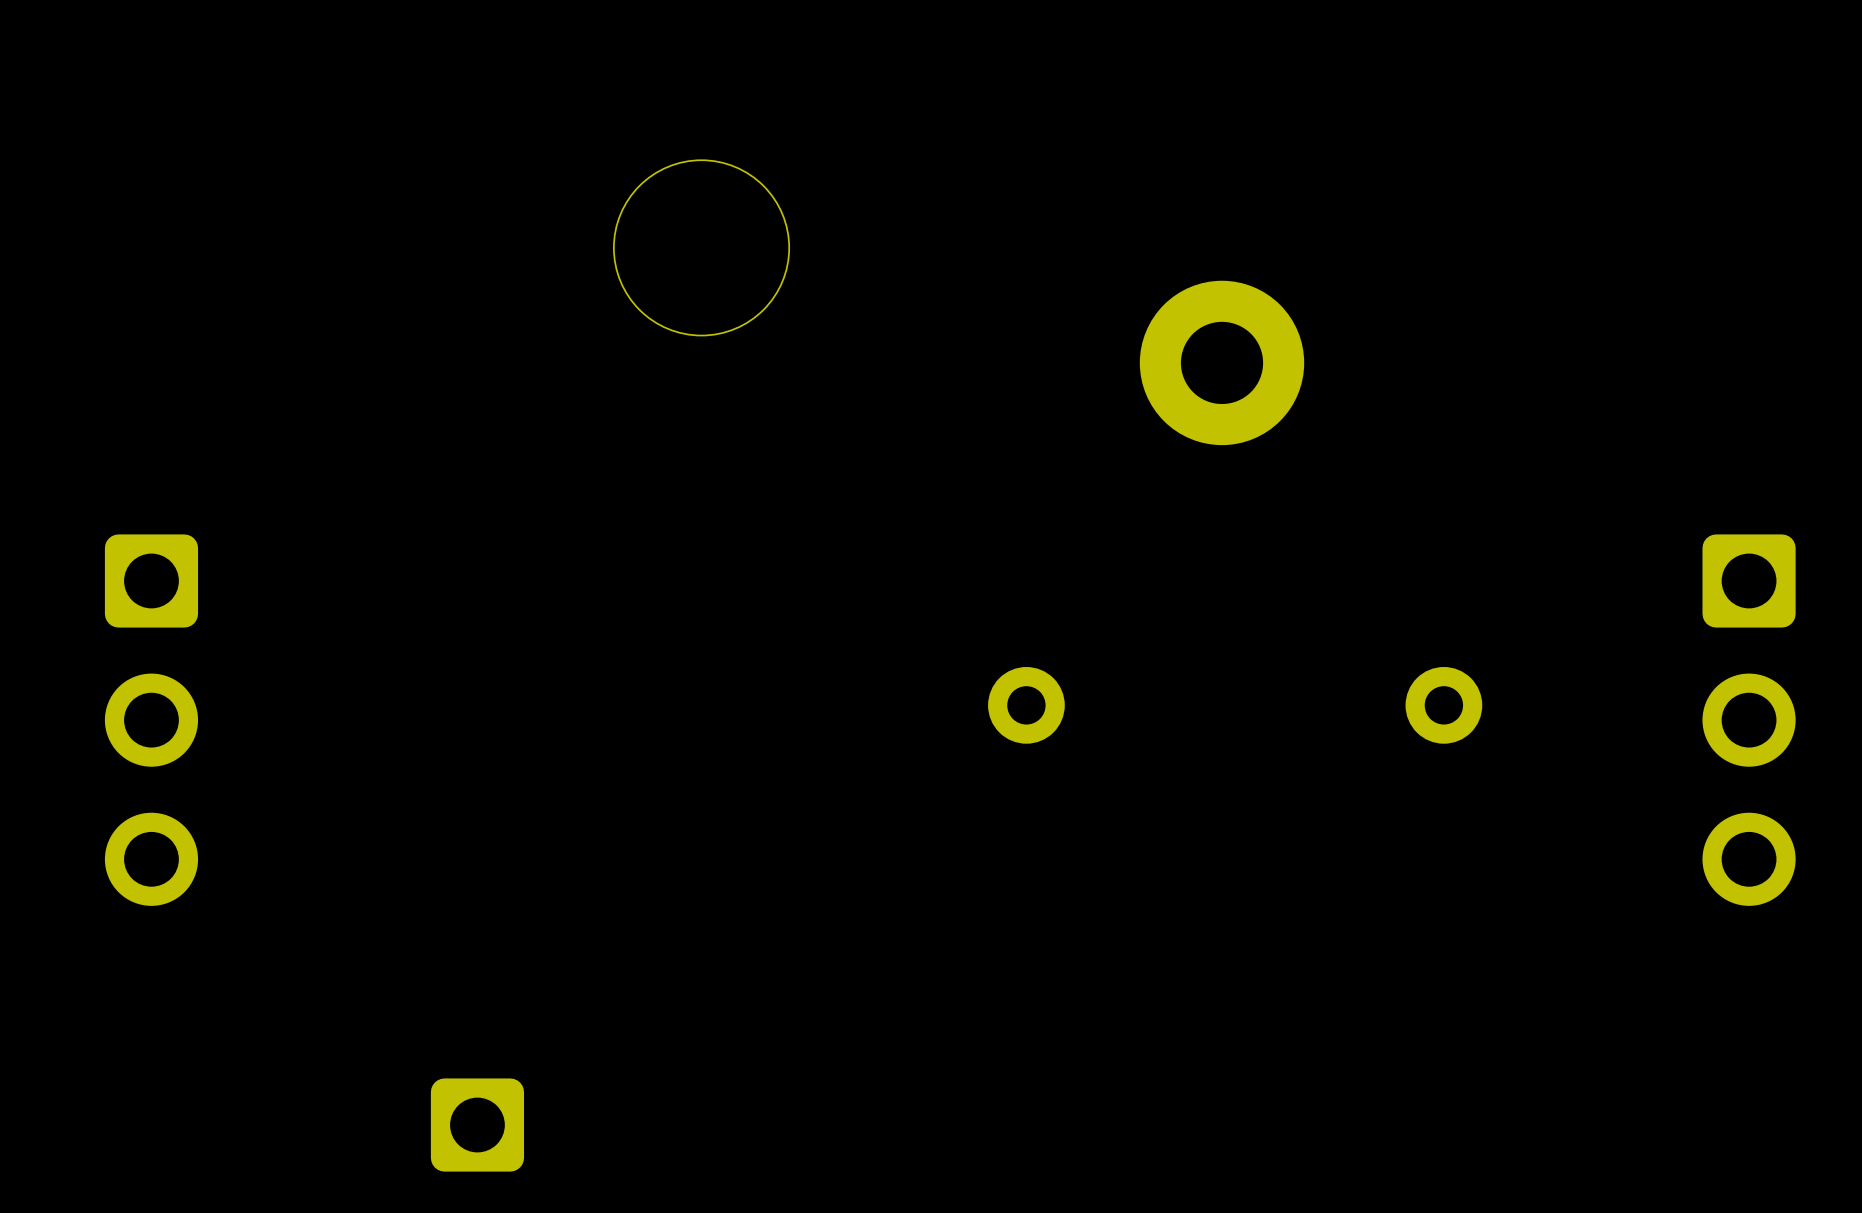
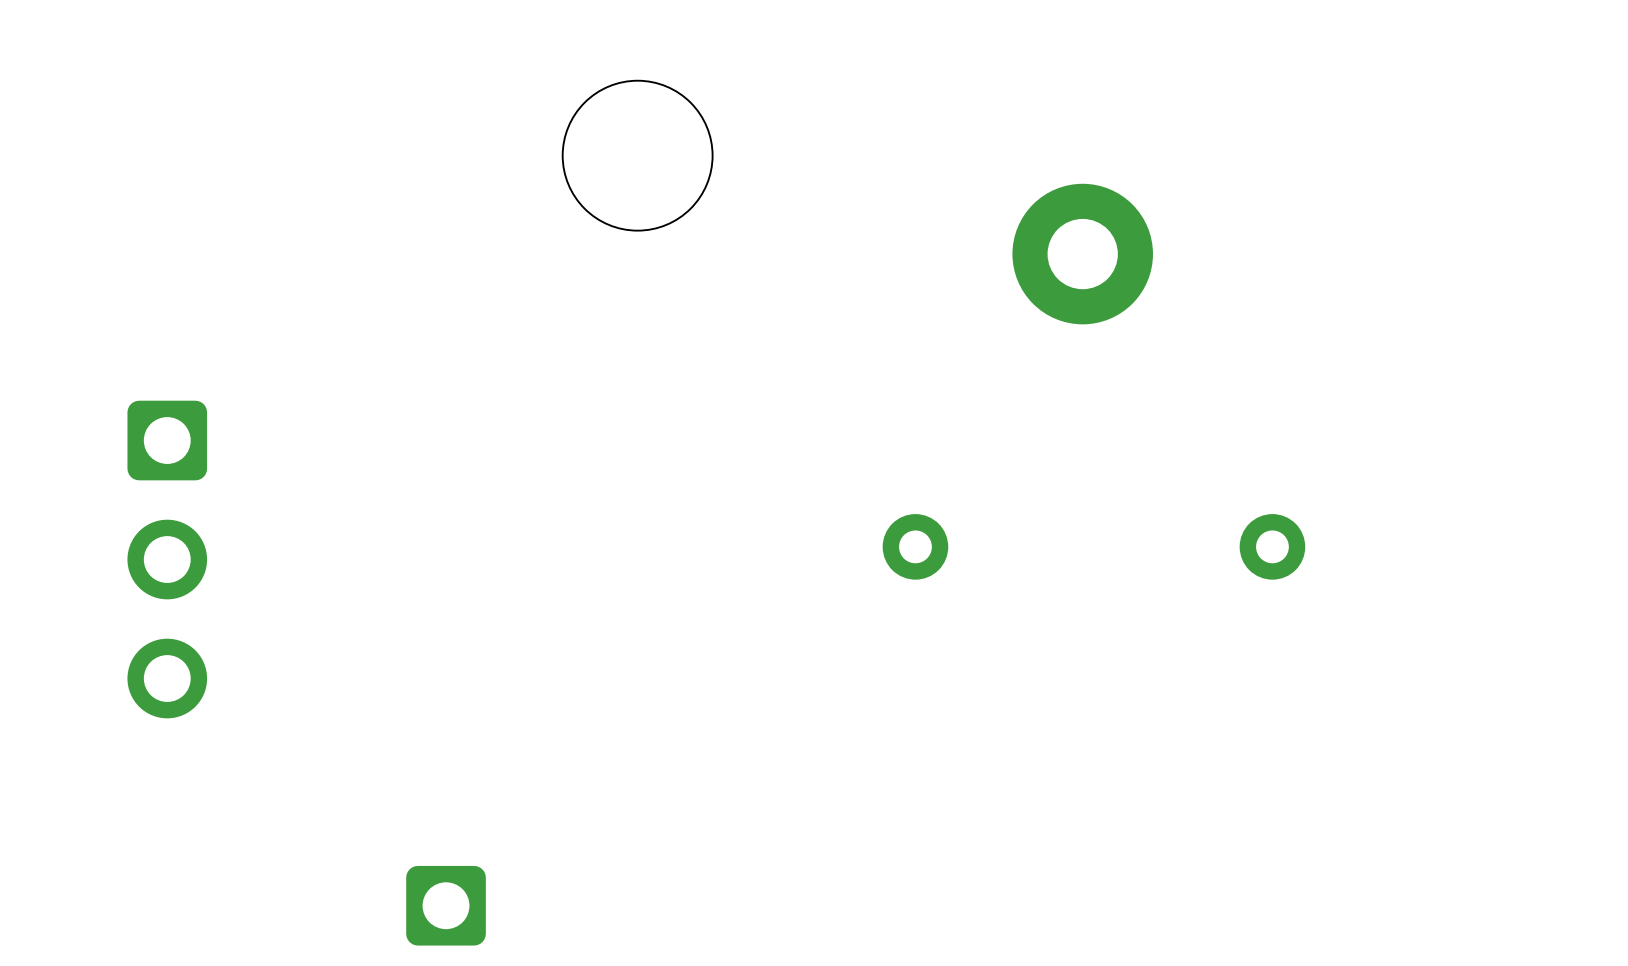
part: (1749, 720) -> none

